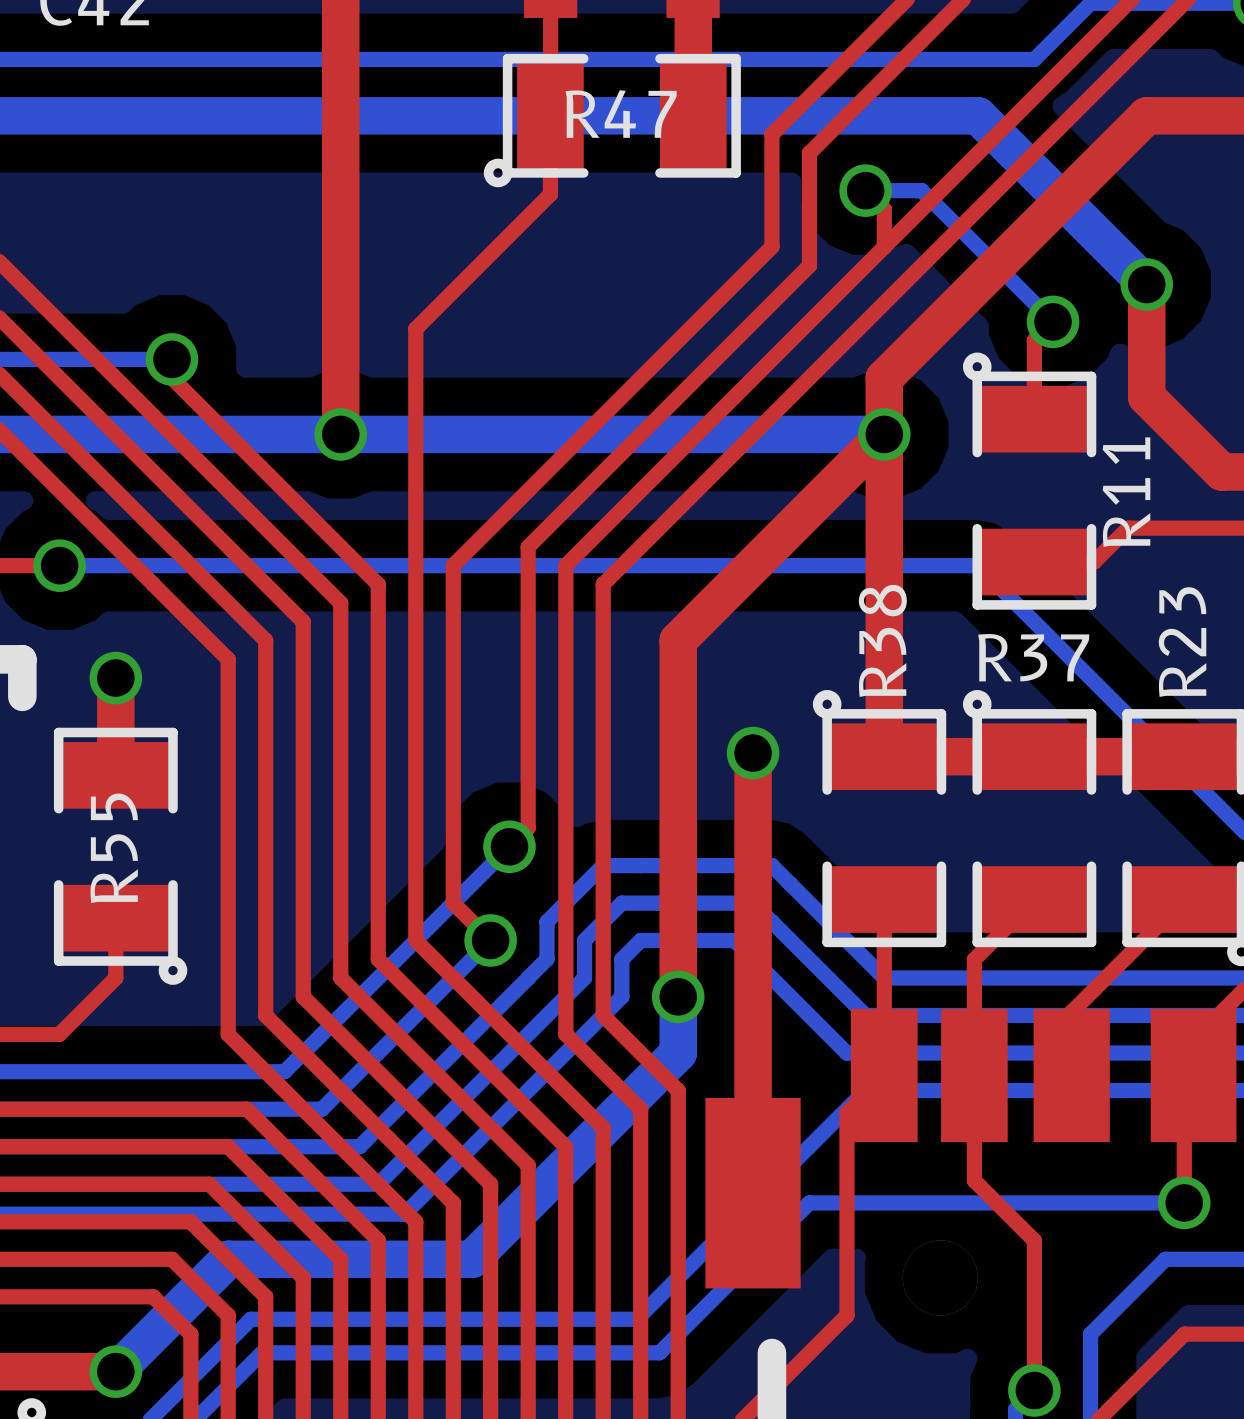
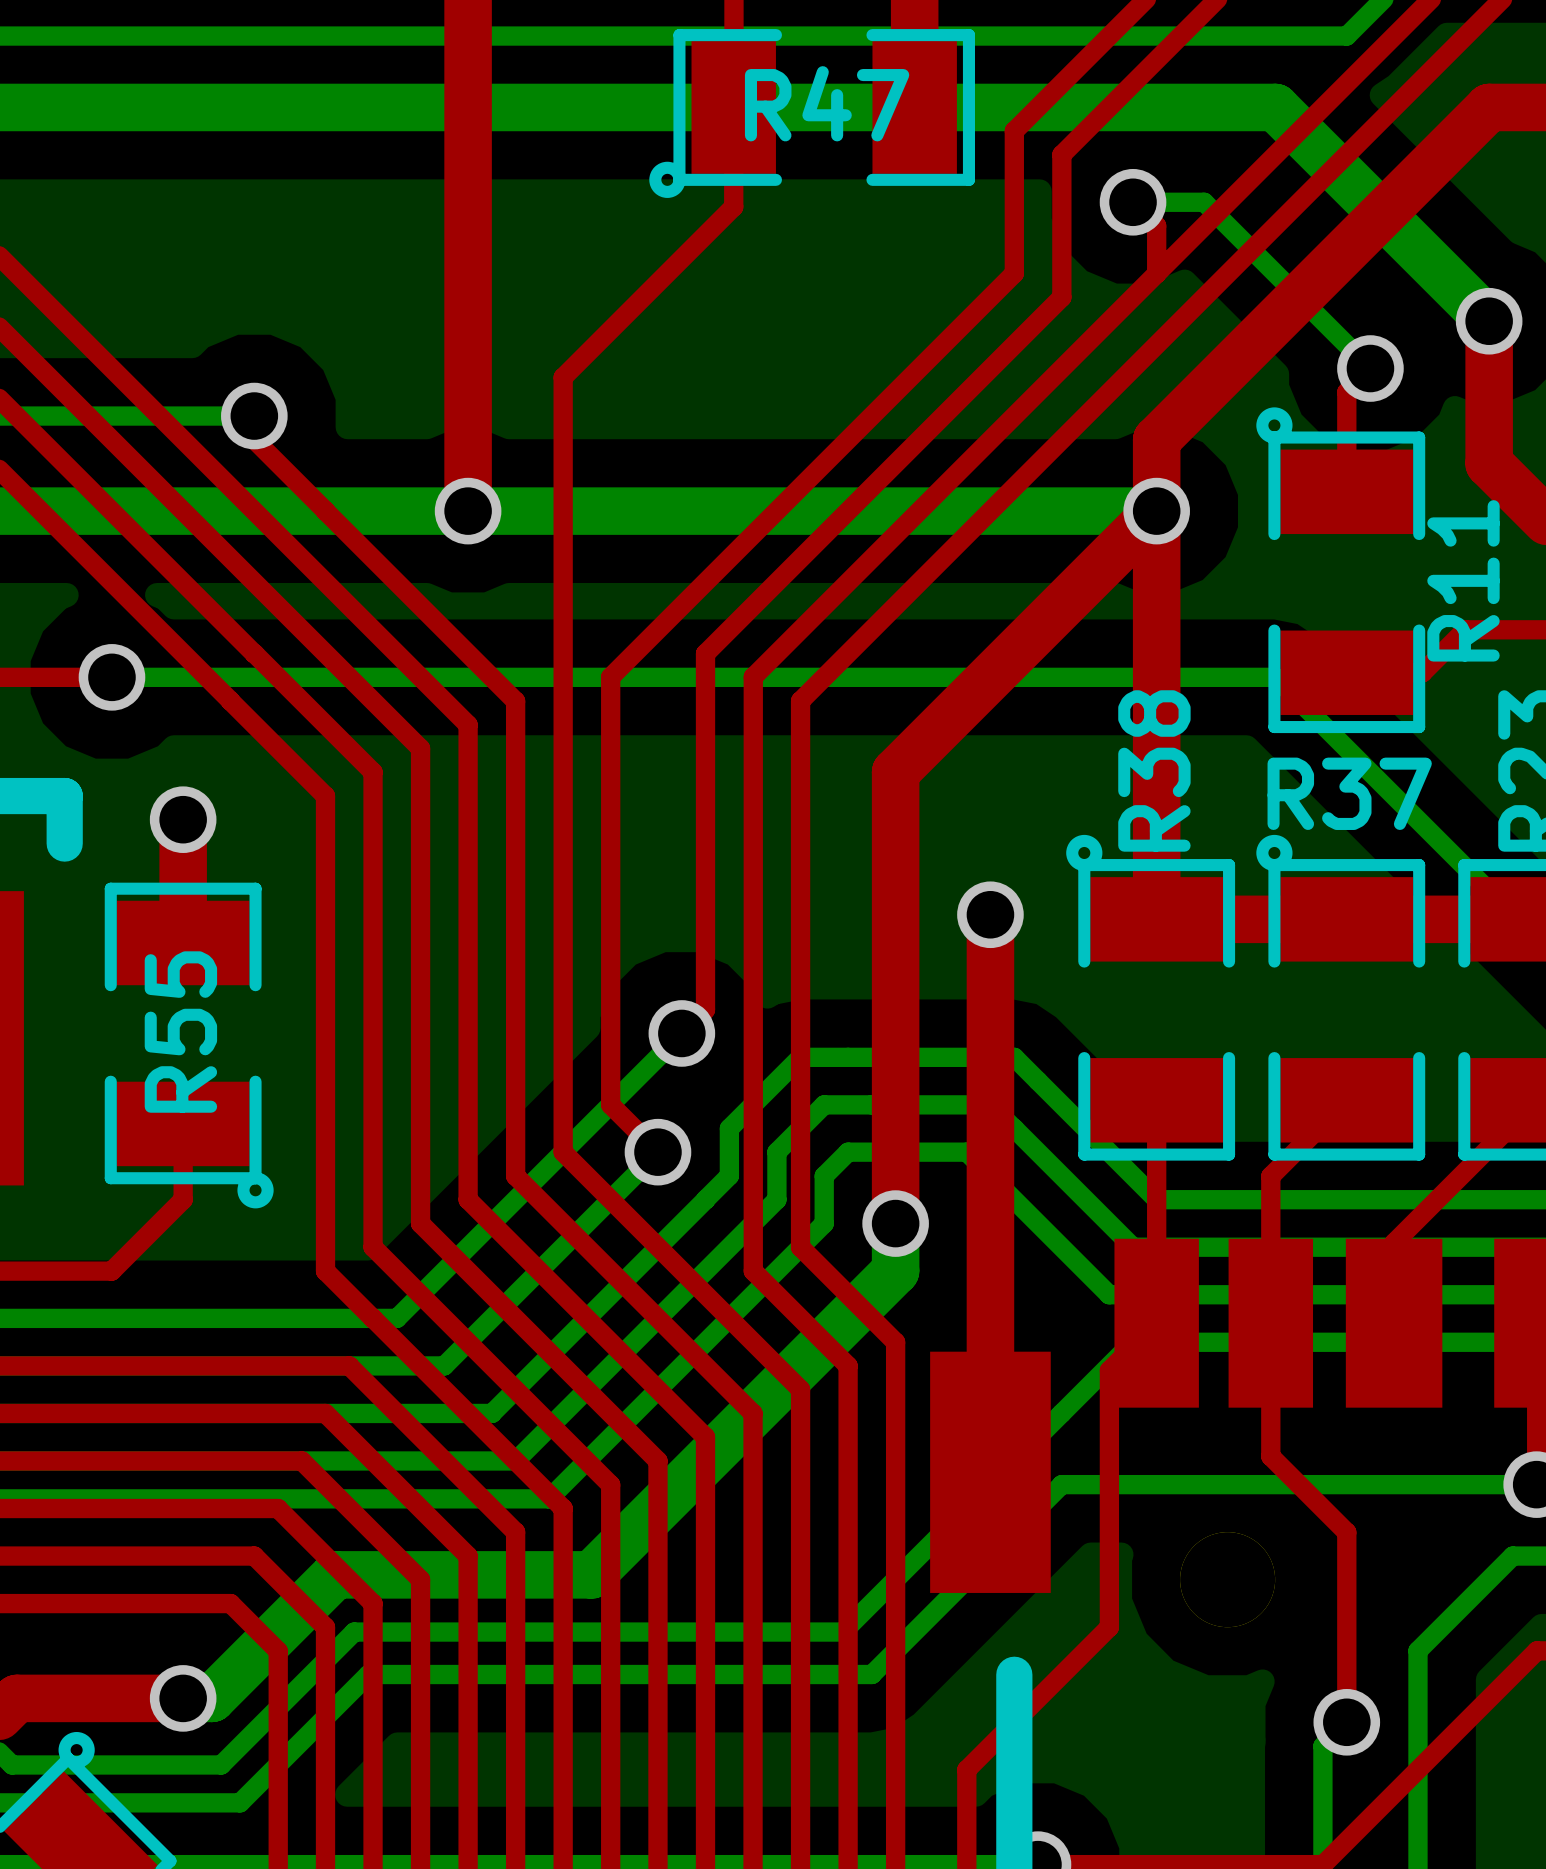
bottom track: (678, 1034) (678, 1053) (471, 1259) (228, 1259) (115, 1371) -> (895, 1270) (591, 1574) (335, 1574) (211, 1698) (183, 1698)

